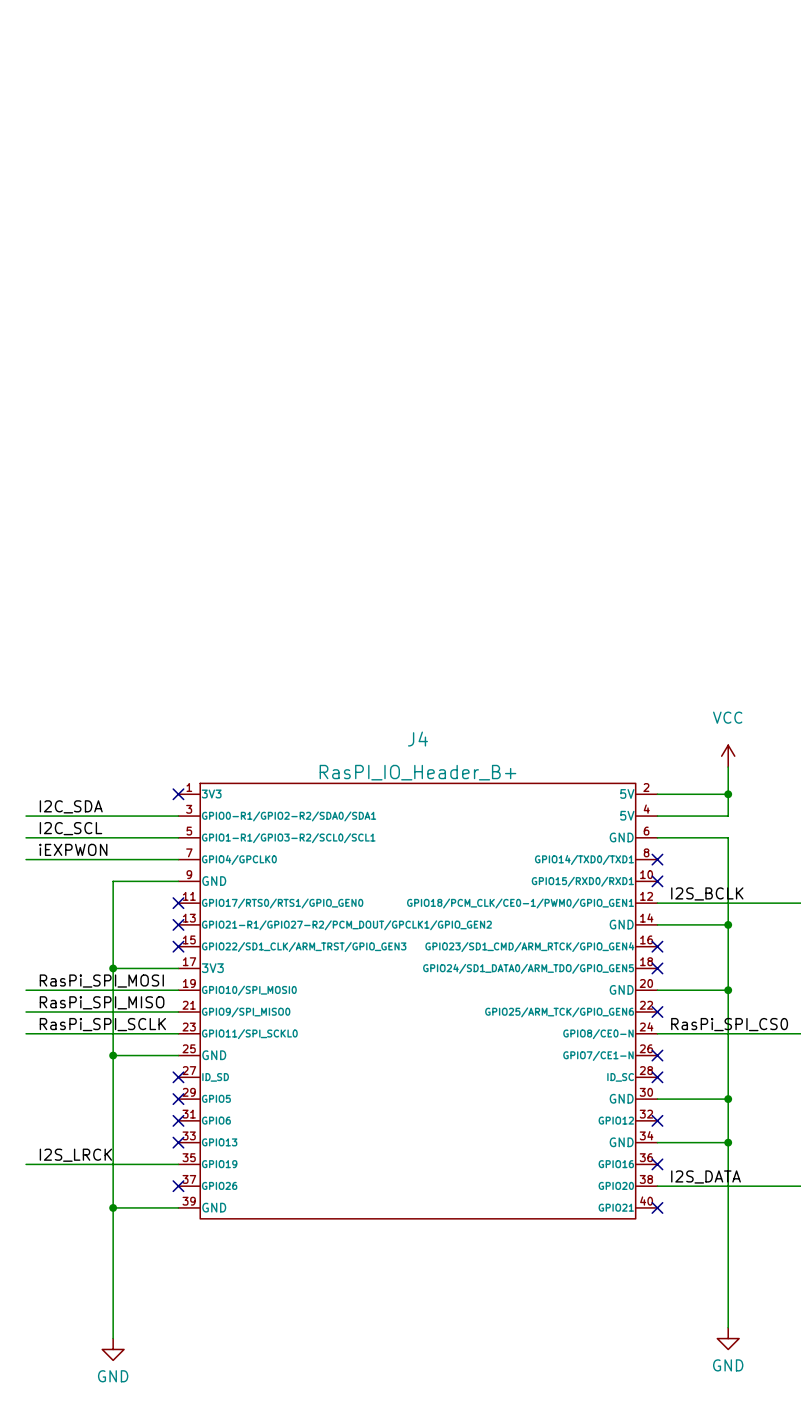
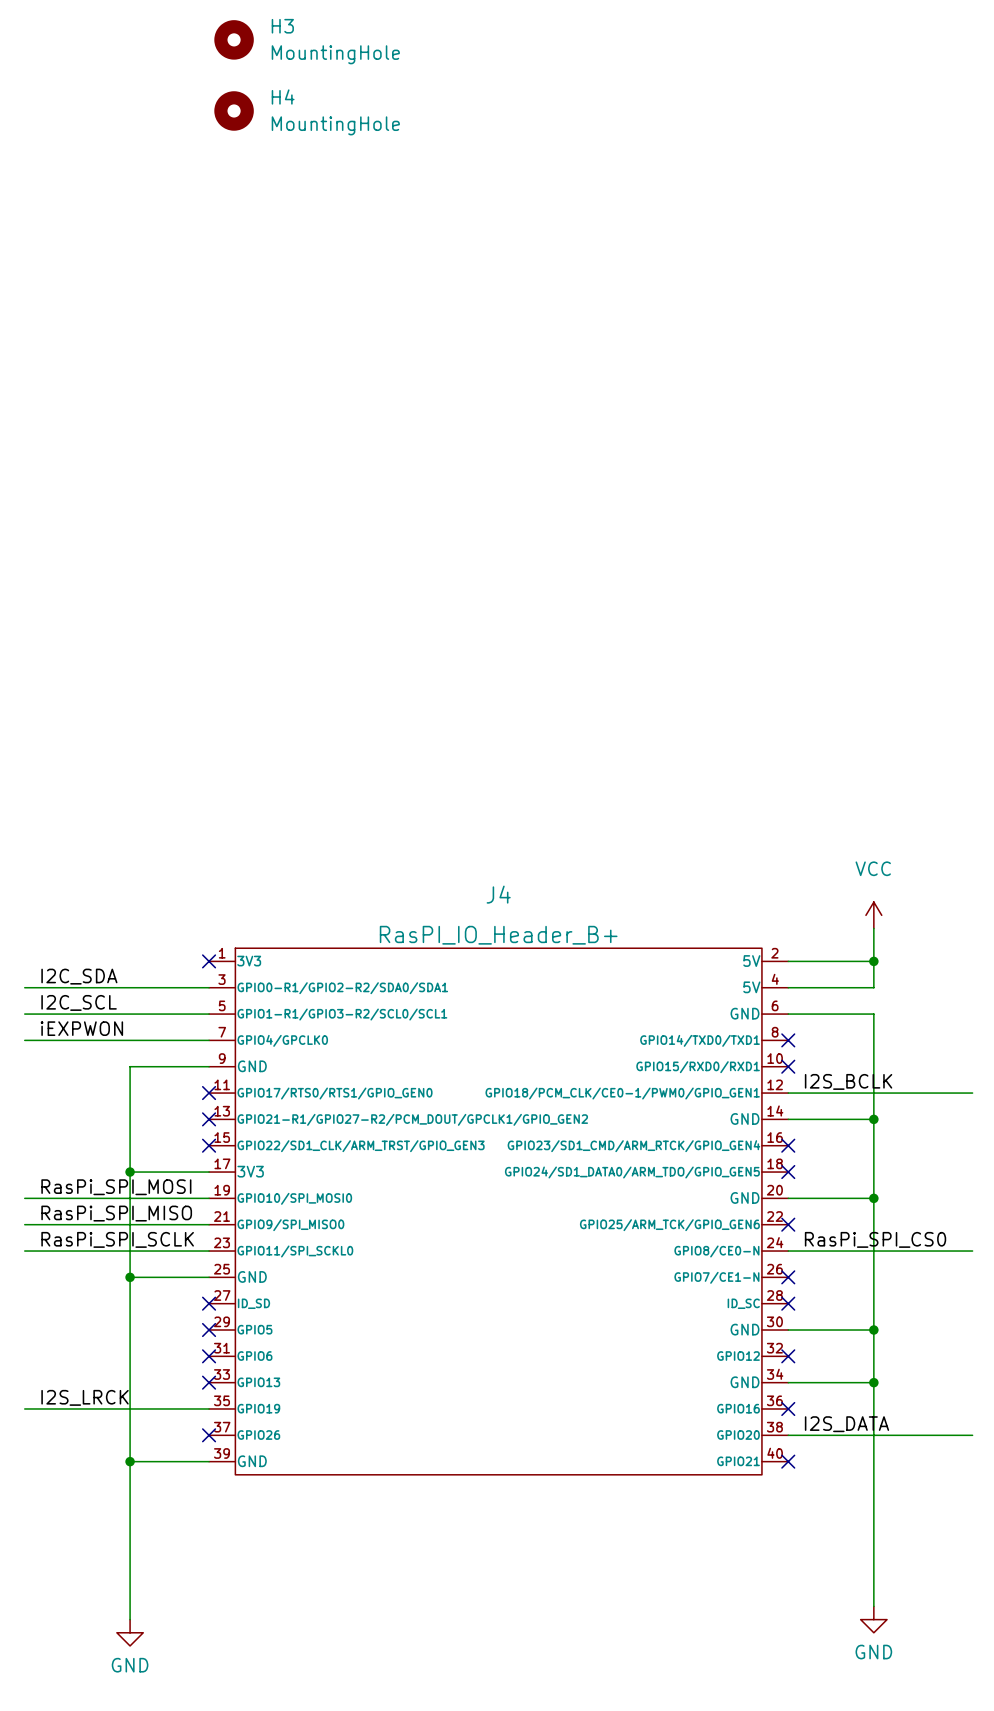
H3: none -> MountingHole (234, 39)
H4: none -> MountingHole (234, 110)

